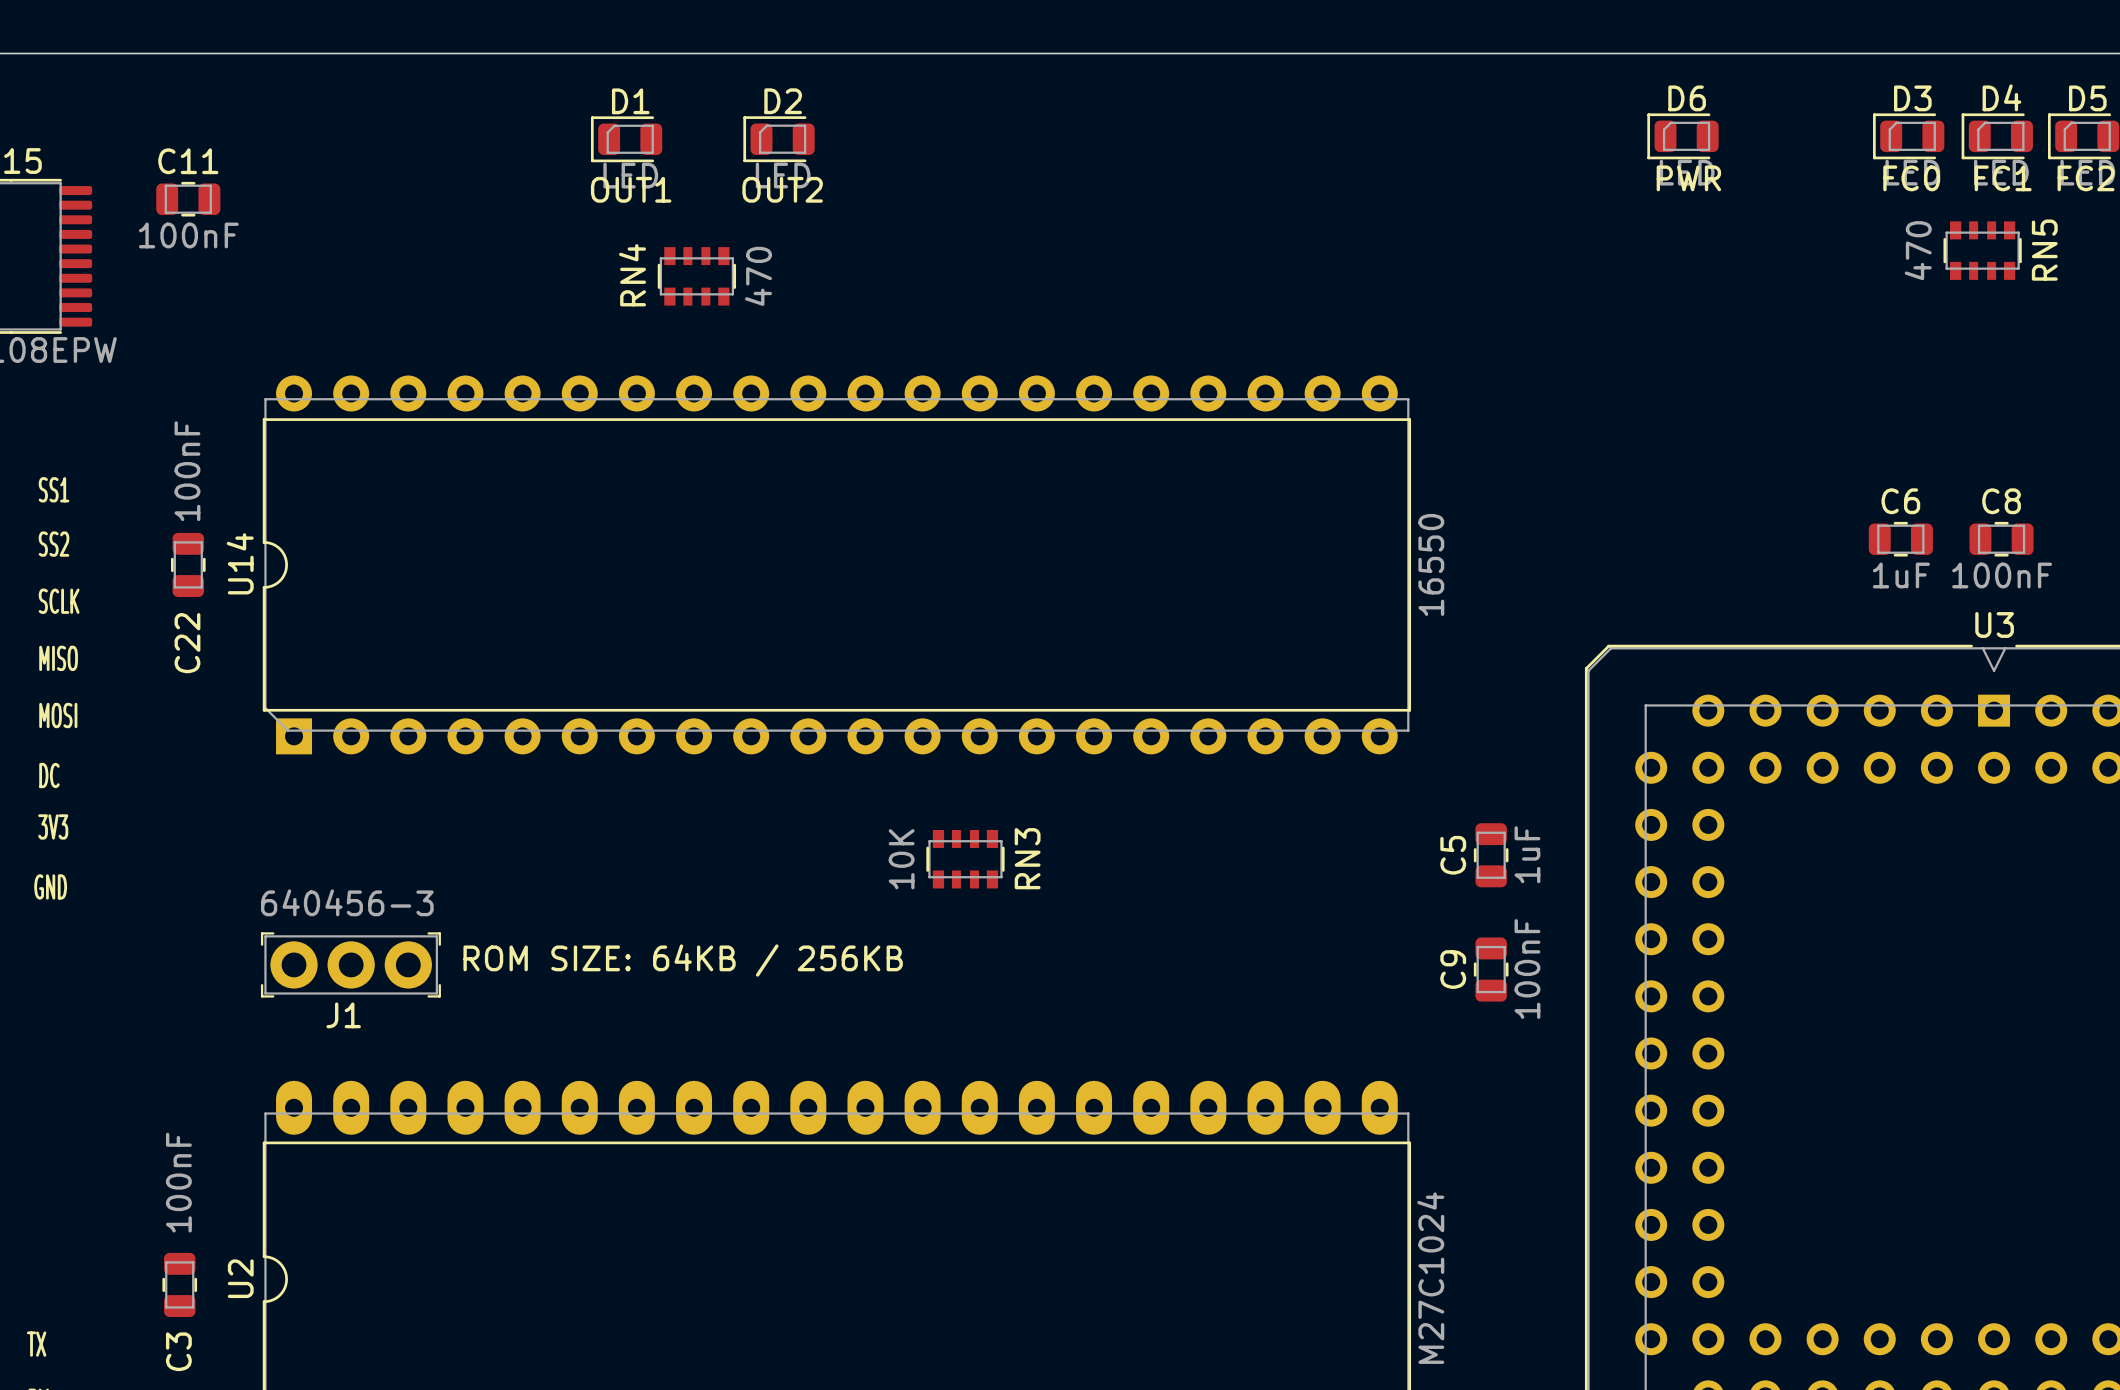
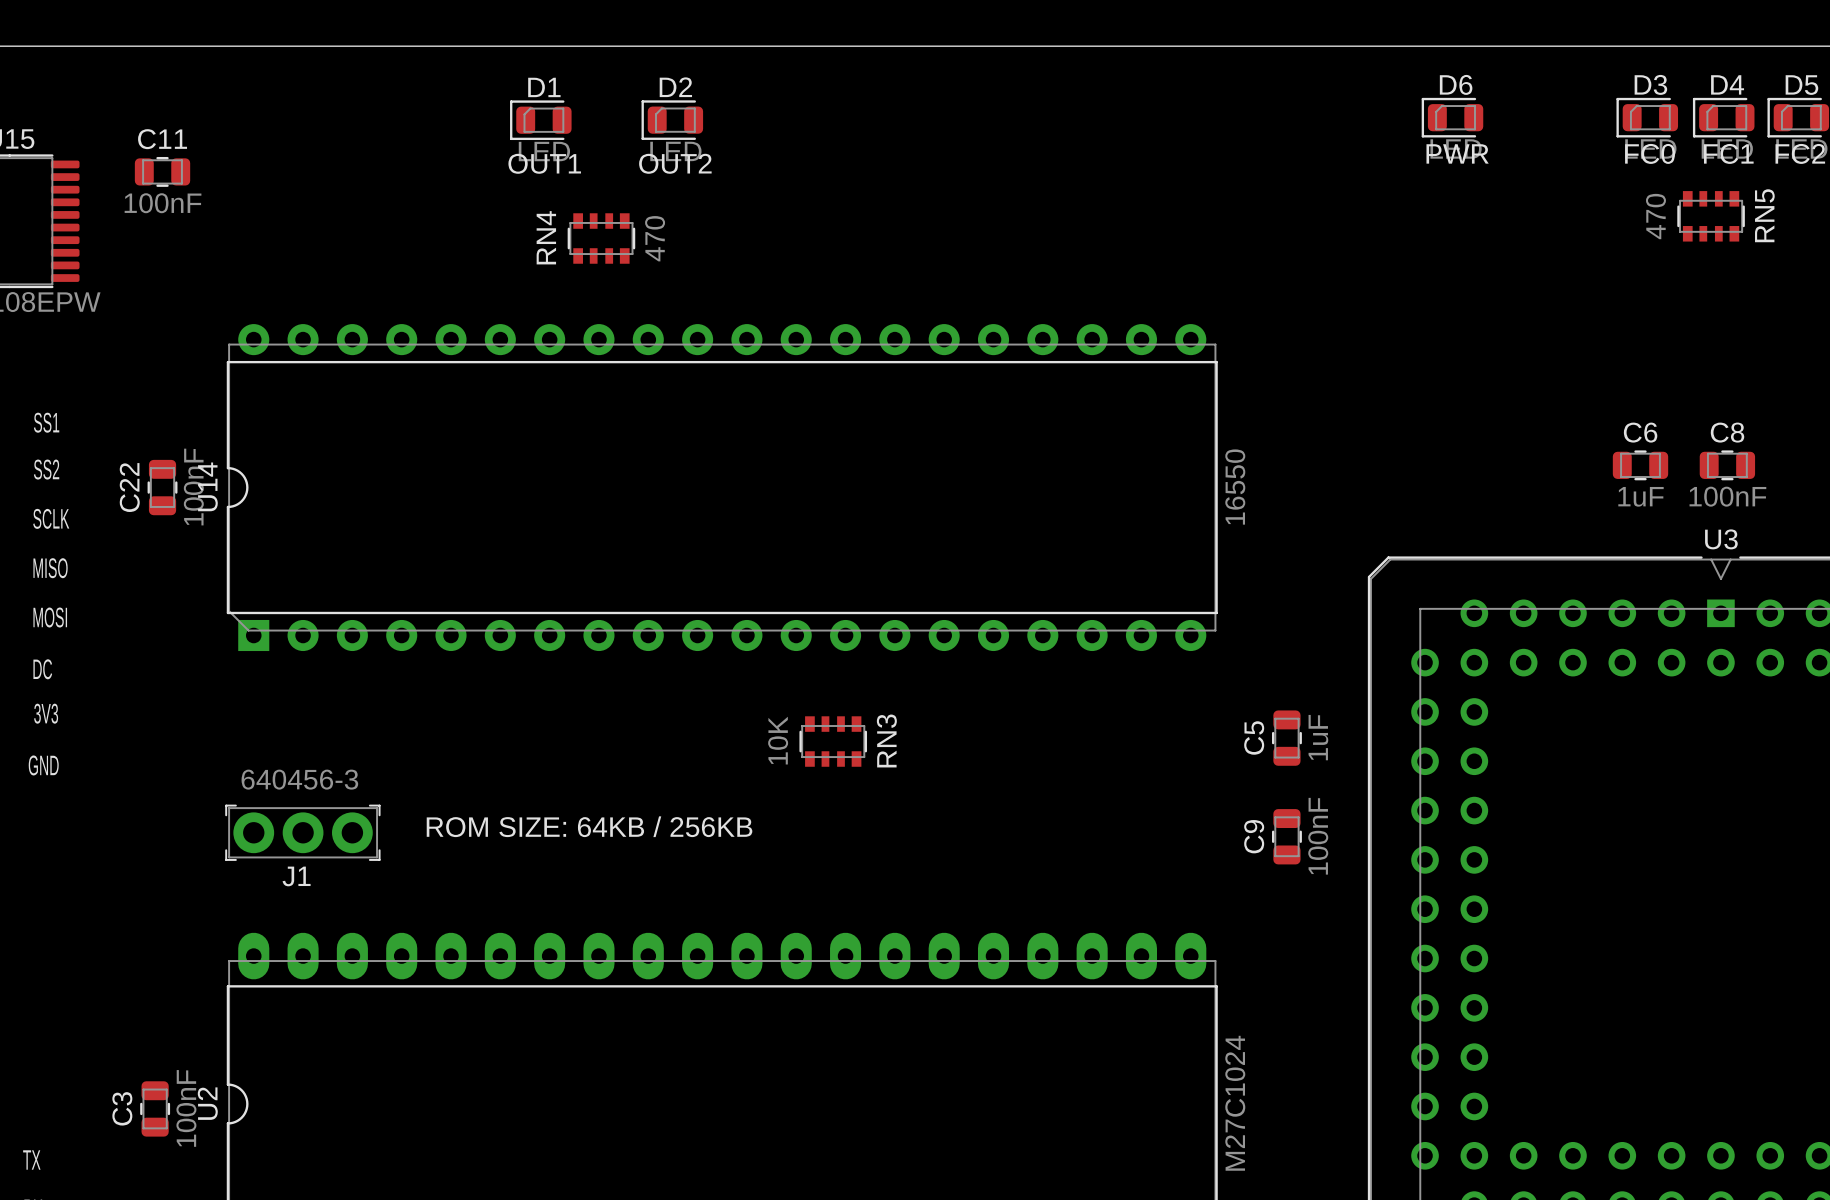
C22 value position: 100nF (187, 471) -> 100nF (193, 487)
C22 name position: C22 (187, 643) -> C22 (129, 487)
C3 value position: 100nF (178, 1182) -> 100nF (186, 1108)
C3 name position: C3 (178, 1351) -> C3 (122, 1108)

